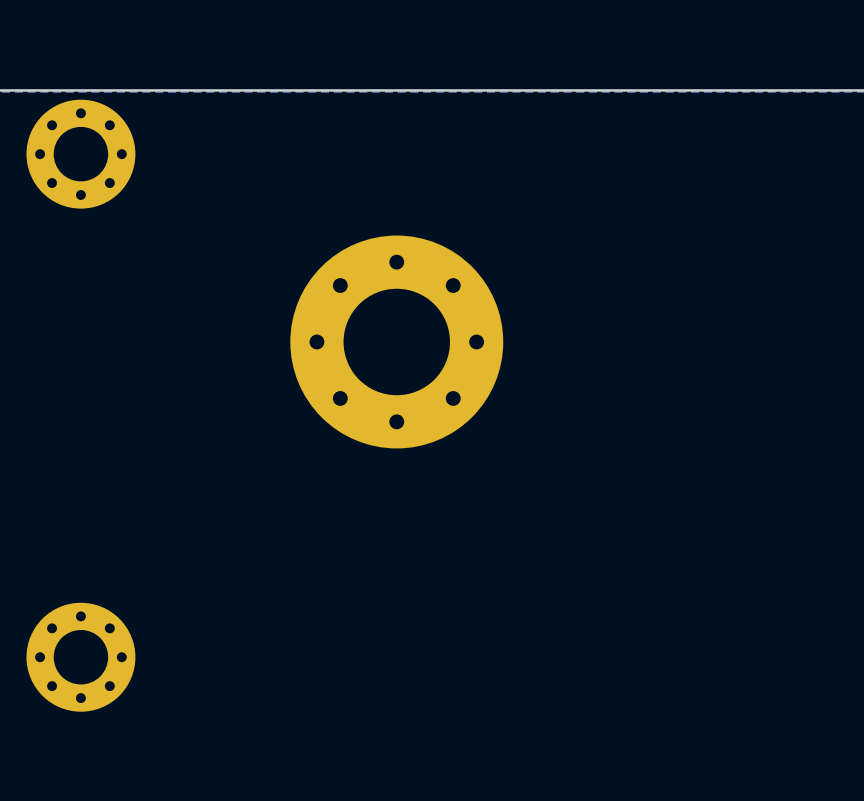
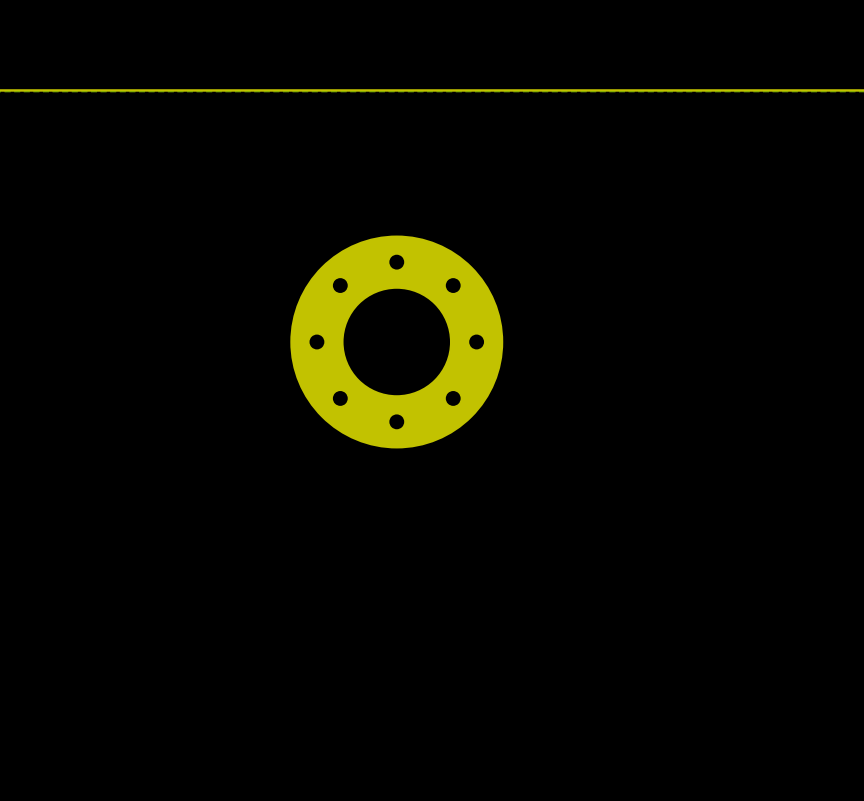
part: (80, 154) -> none
part: (80, 657) -> none

